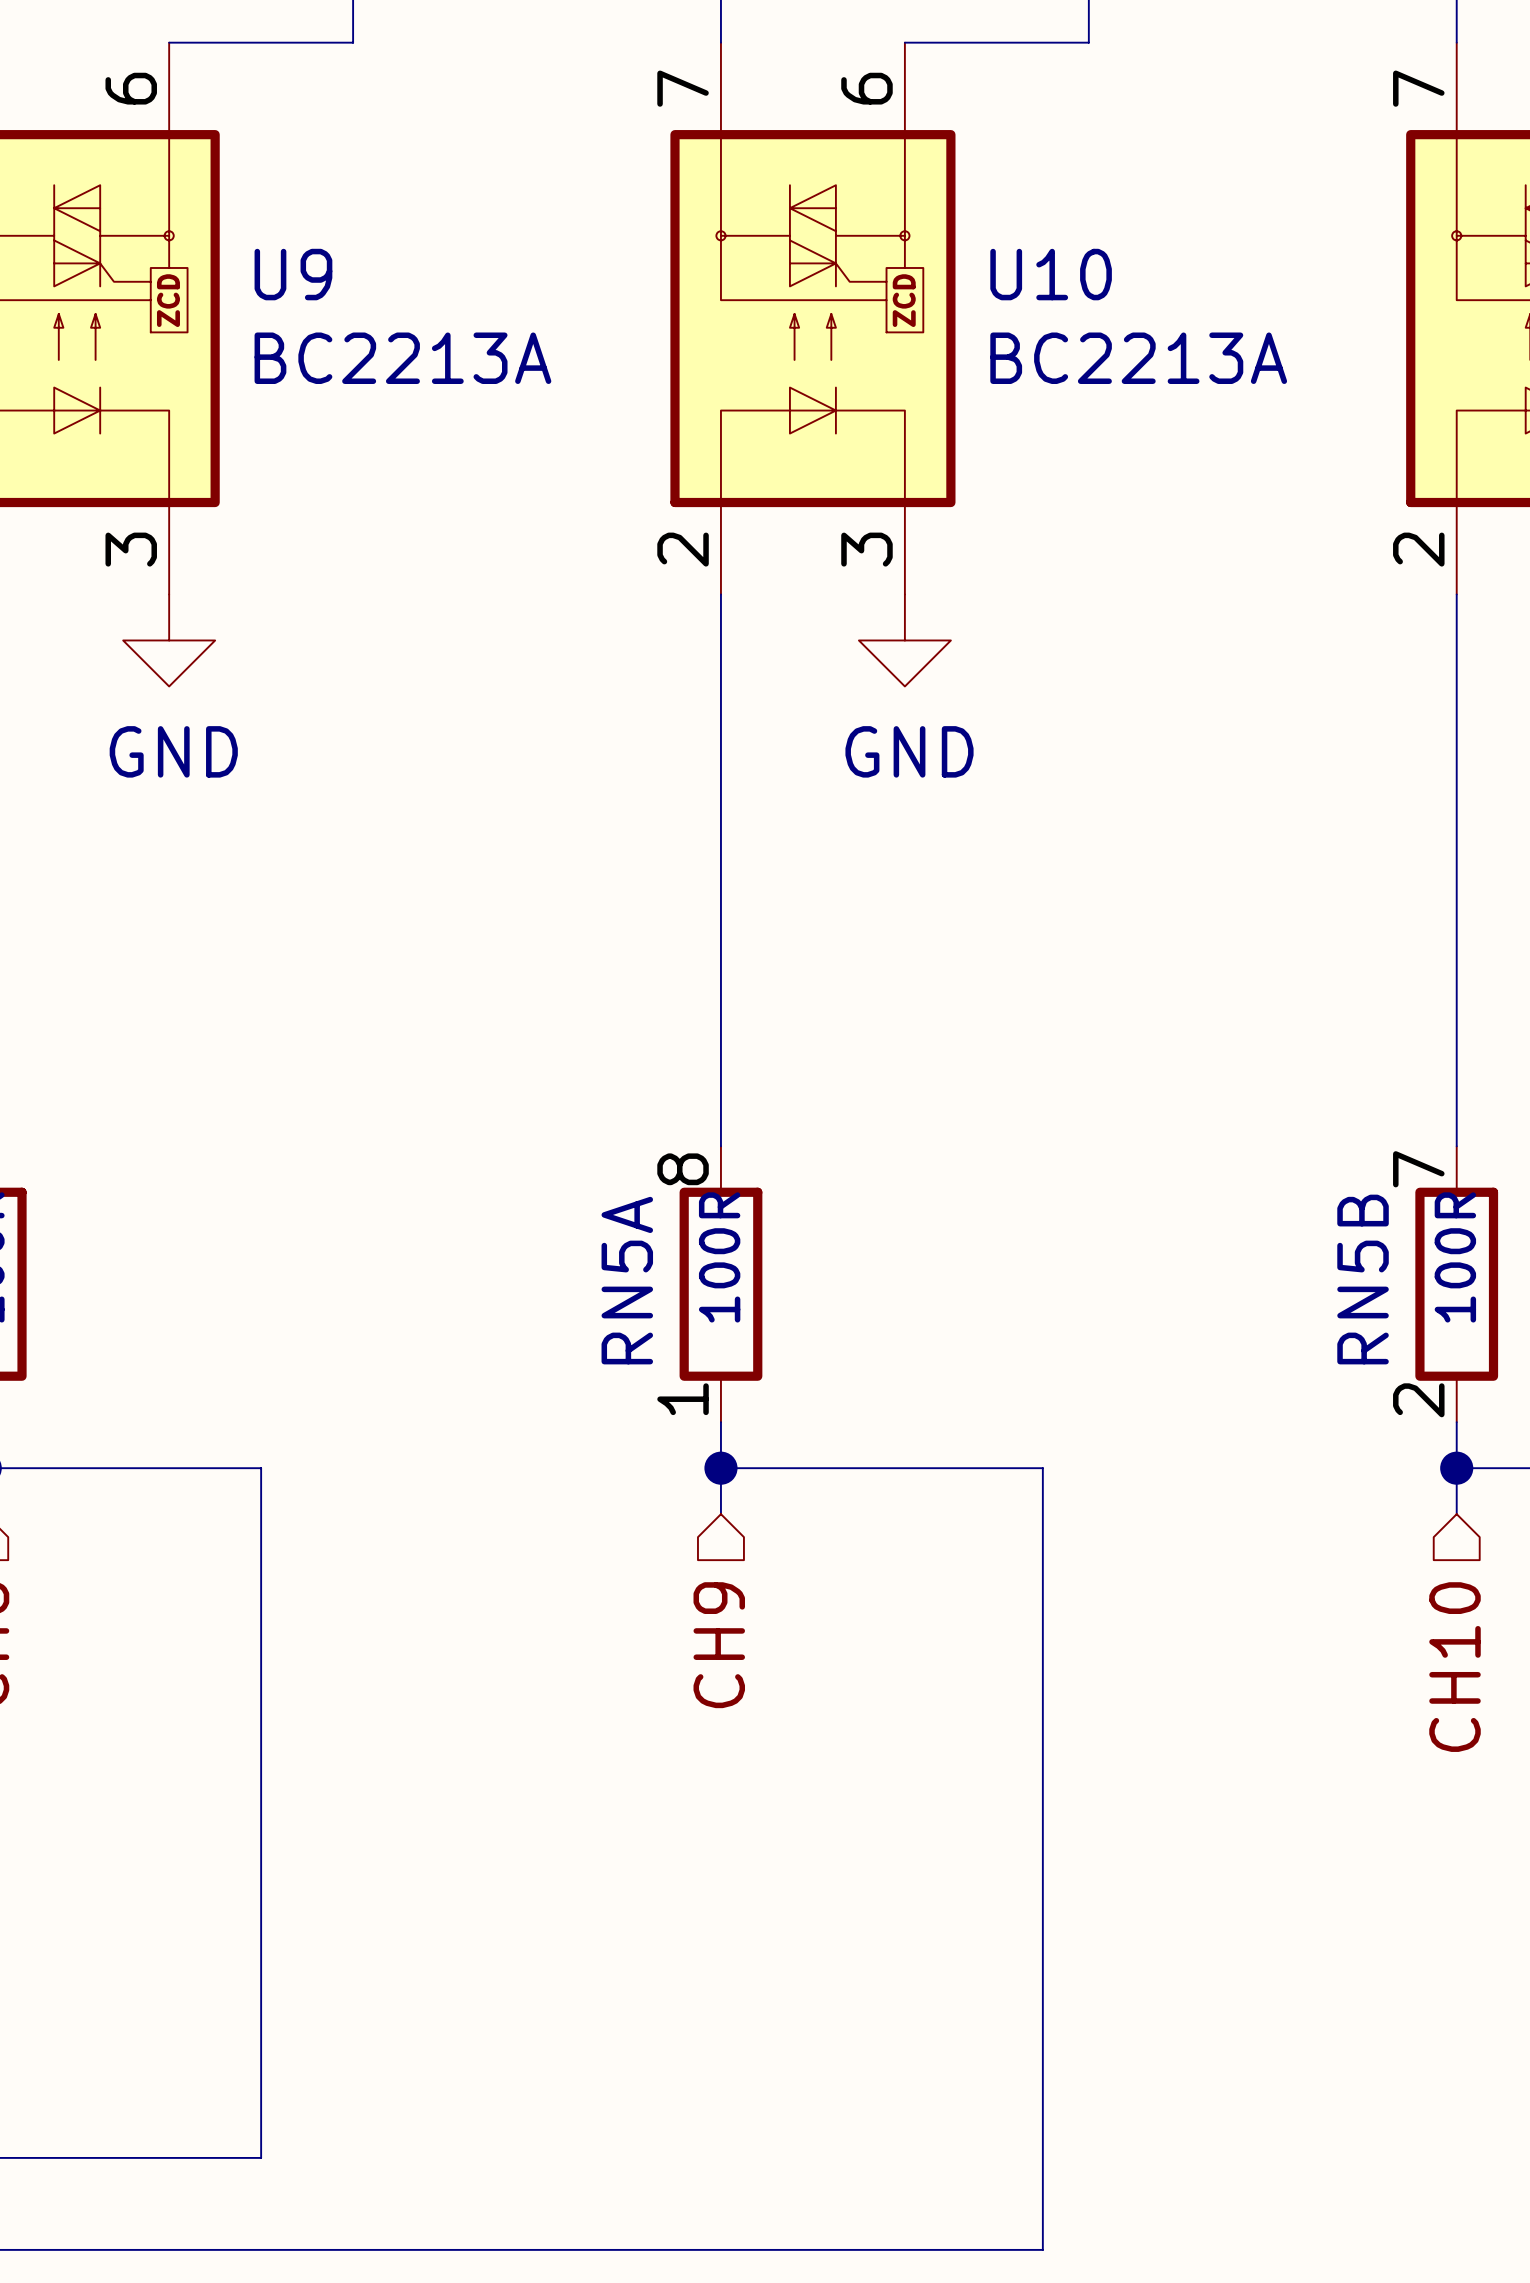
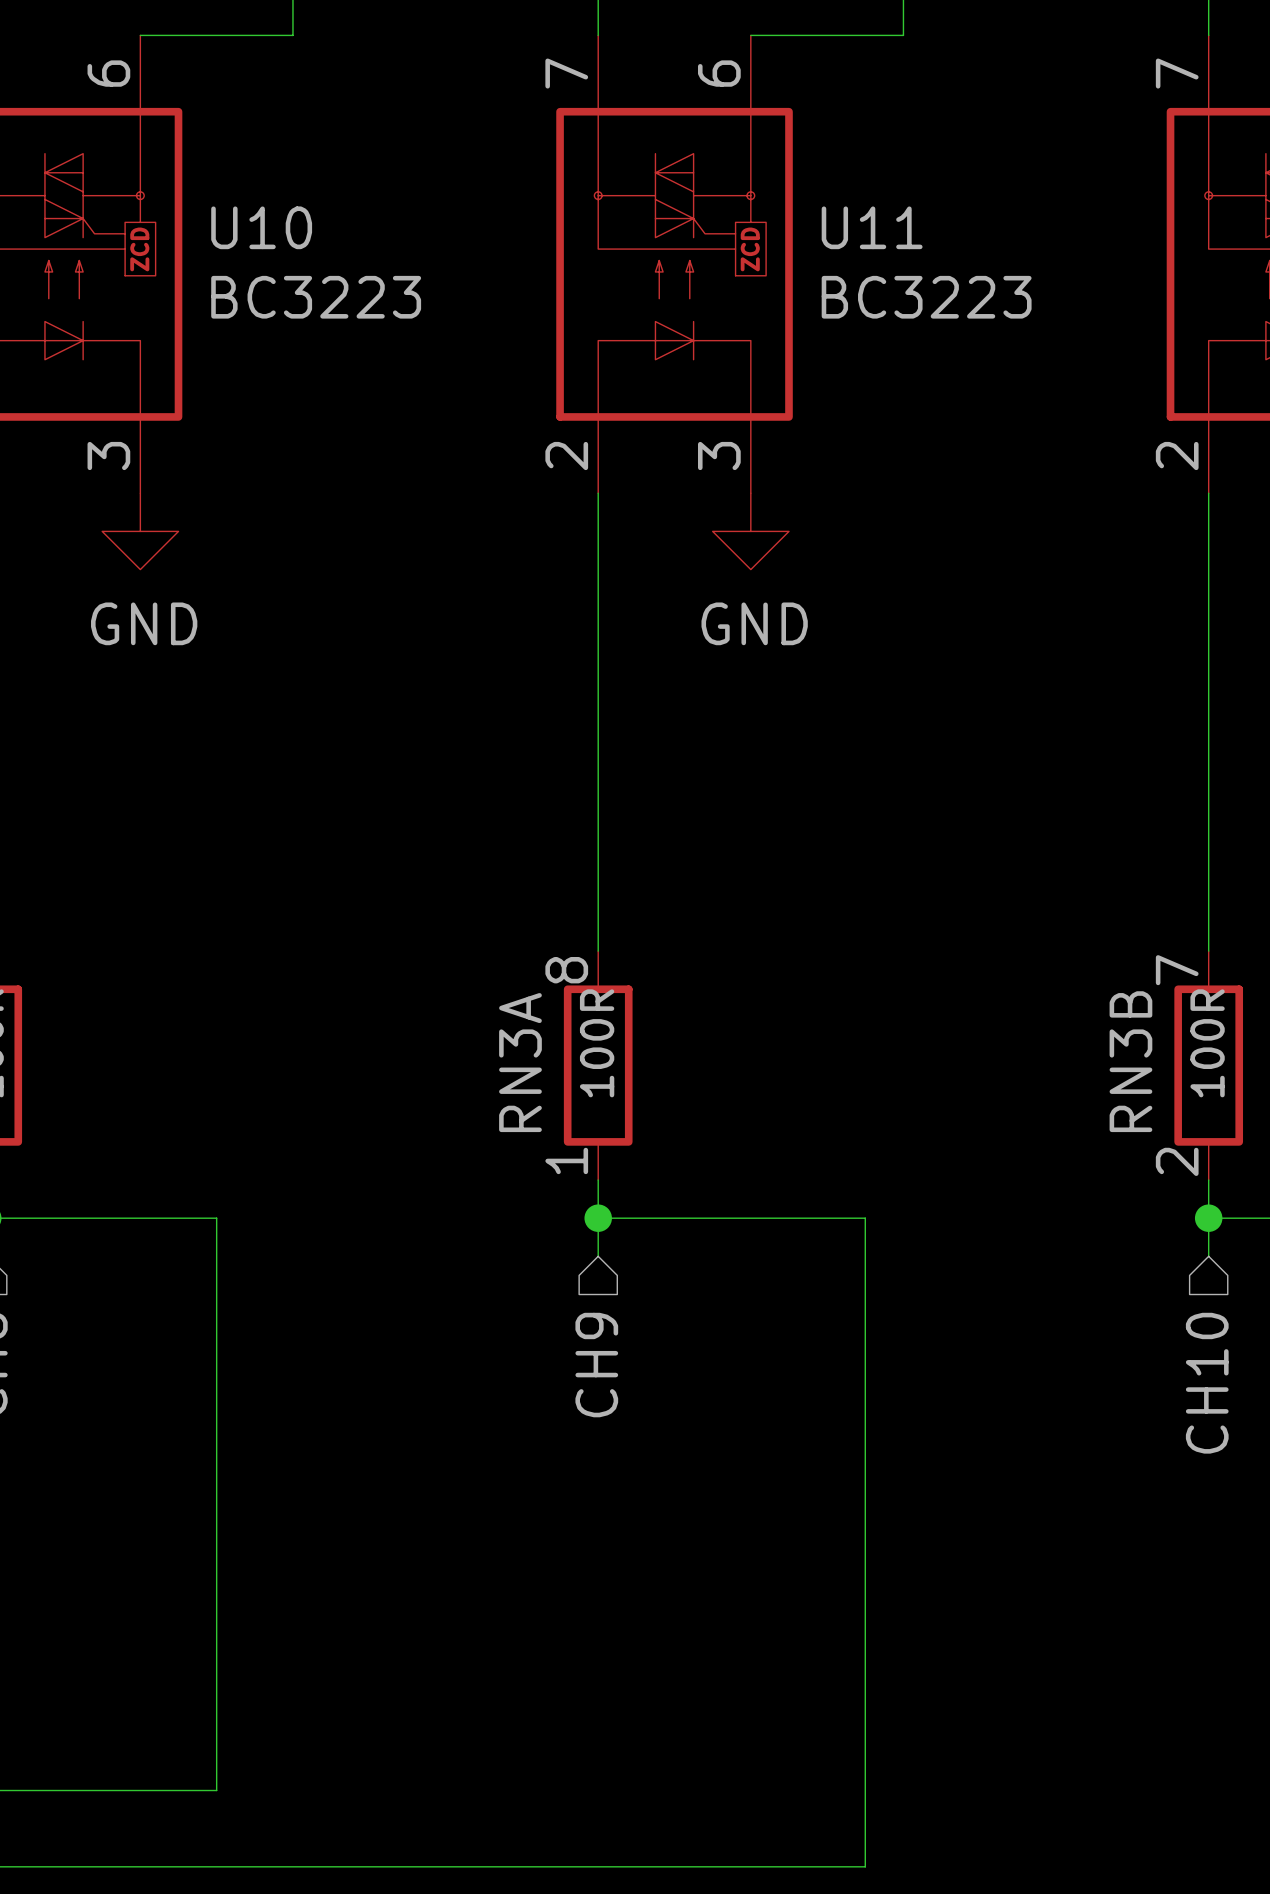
U9 name: U9 (293, 274) -> U10 (261, 227)
U10 name: U10 (1051, 274) -> U11 (872, 227)
U9 value: BC2213A (402, 358) -> BC3223 (316, 297)
U10 value: BC2213A (1138, 358) -> BC3223 (926, 297)
RN5B name: RN5B (1363, 1279) -> RN3B (1130, 1061)
RN5A name: RN5A (627, 1280) -> RN3A (520, 1062)

